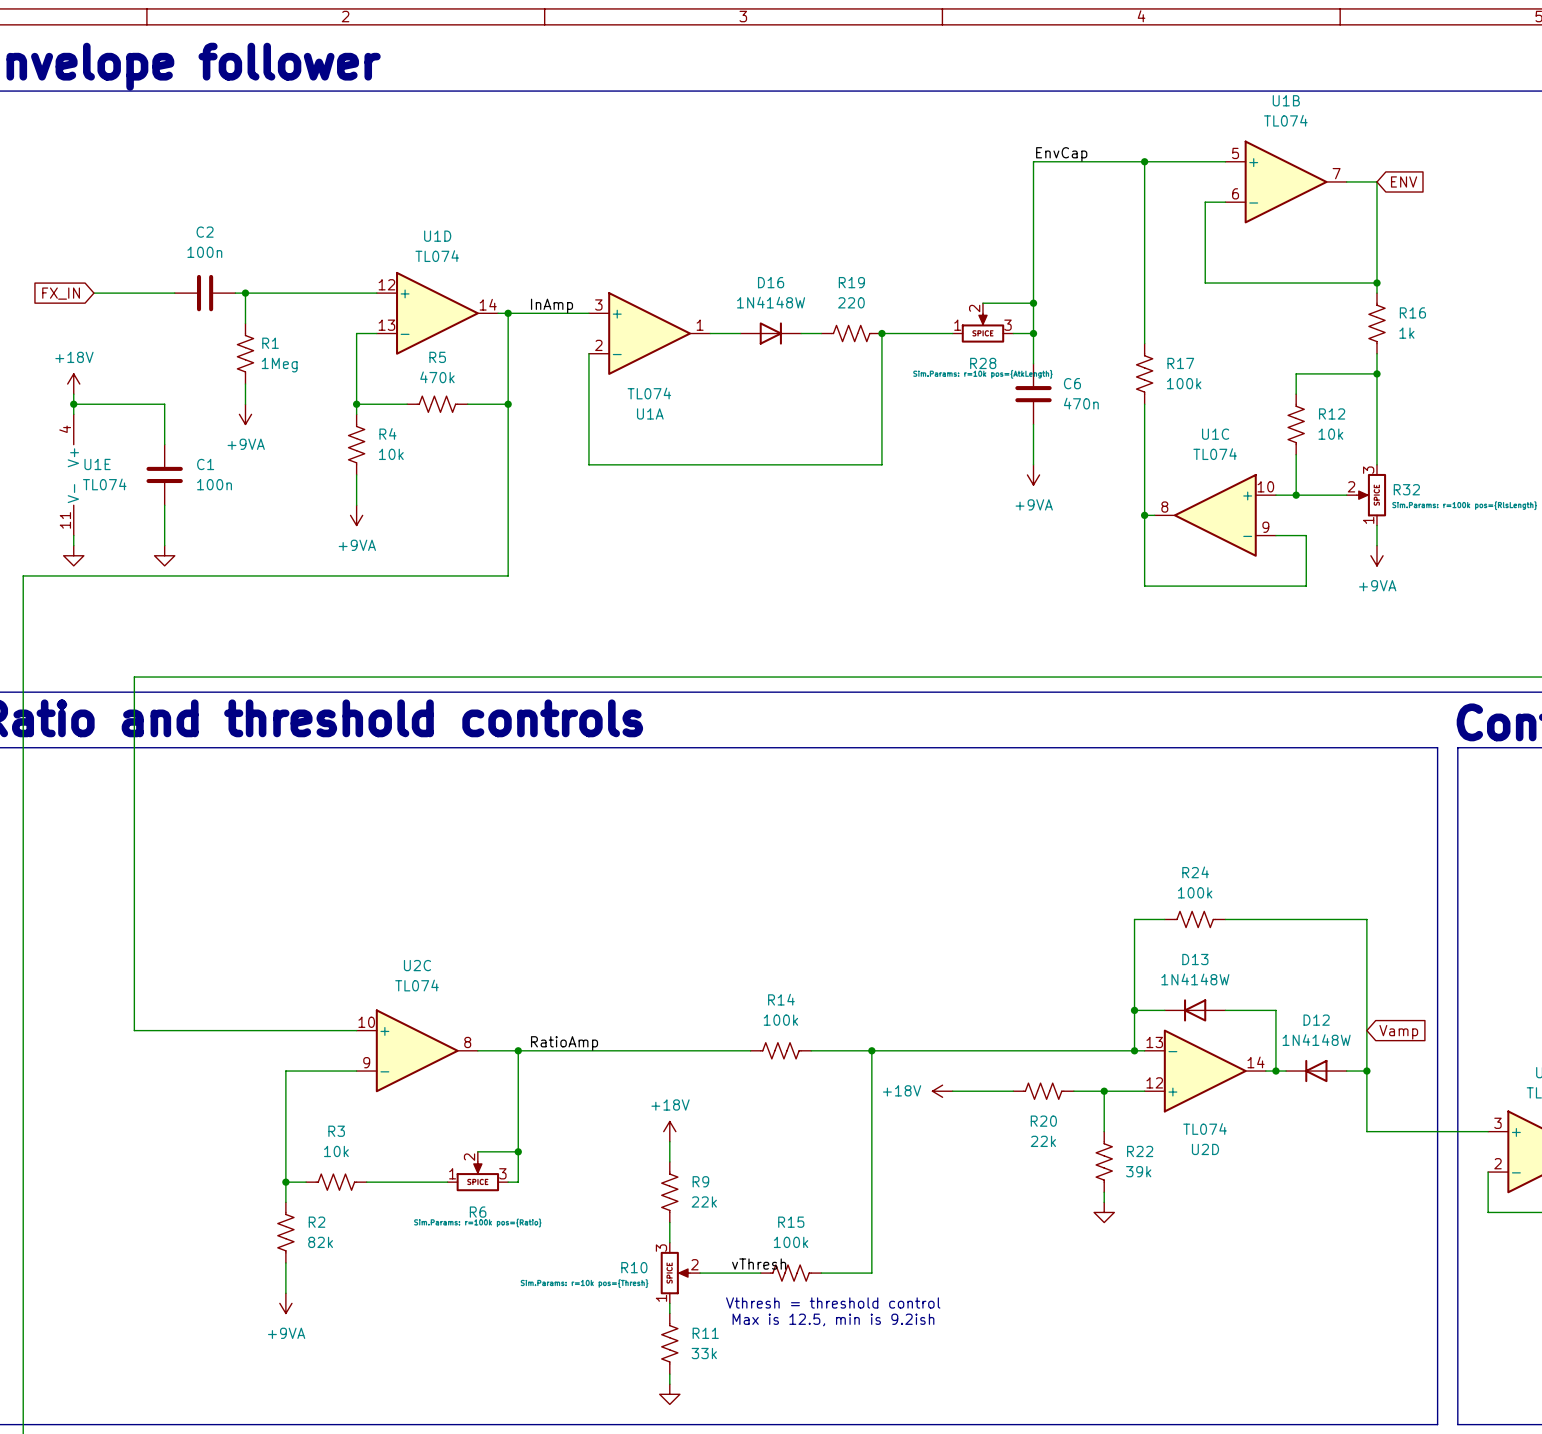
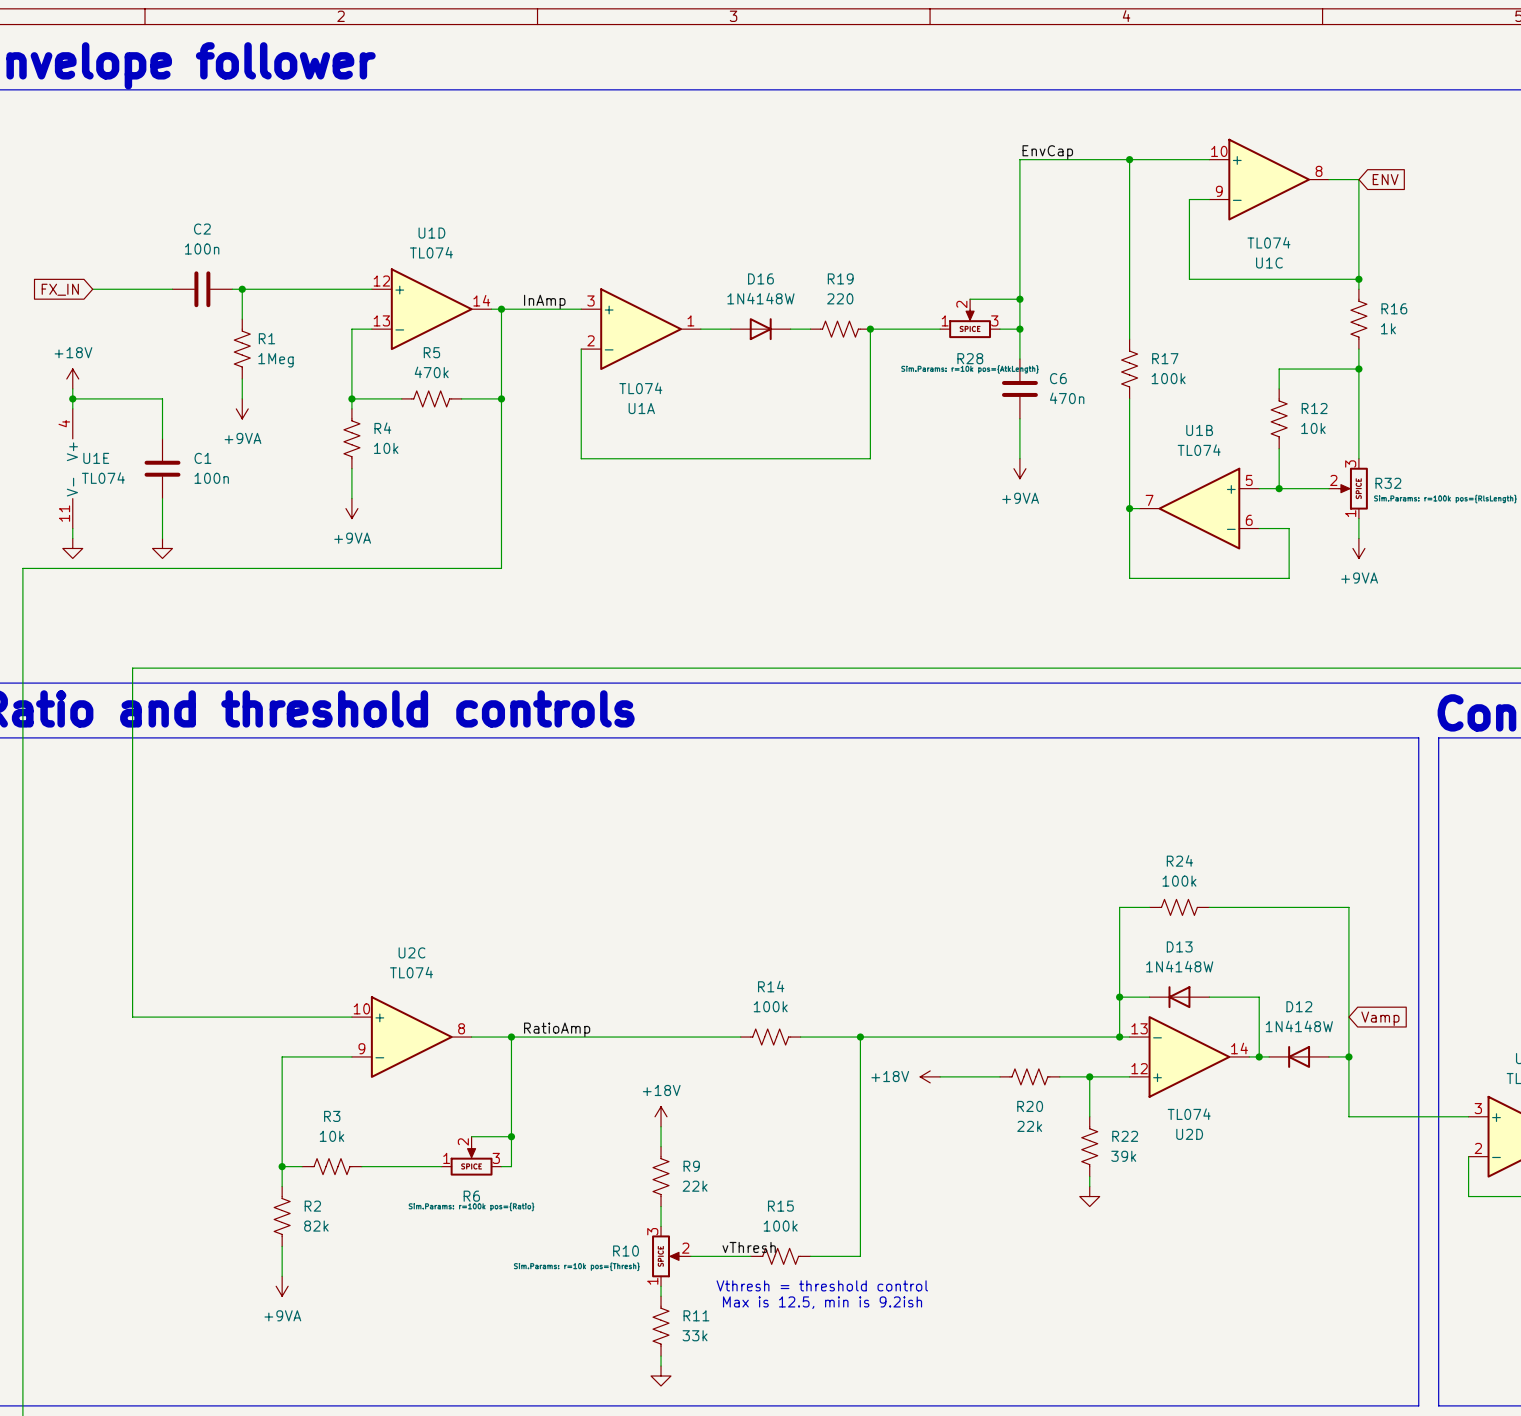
U1B flip: as is (1286, 181) -> left-right (1199, 508)
U1B position: (1286, 181) -> (1199, 508)
U1C name position: U1C (1215, 434) -> U1C (1269, 262)
U1C value position: TL074 (1215, 454) -> TL074 (1268, 242)
U1C flip: as is (1215, 515) -> left-right (1269, 179)
U1C position: (1215, 515) -> (1269, 179)

